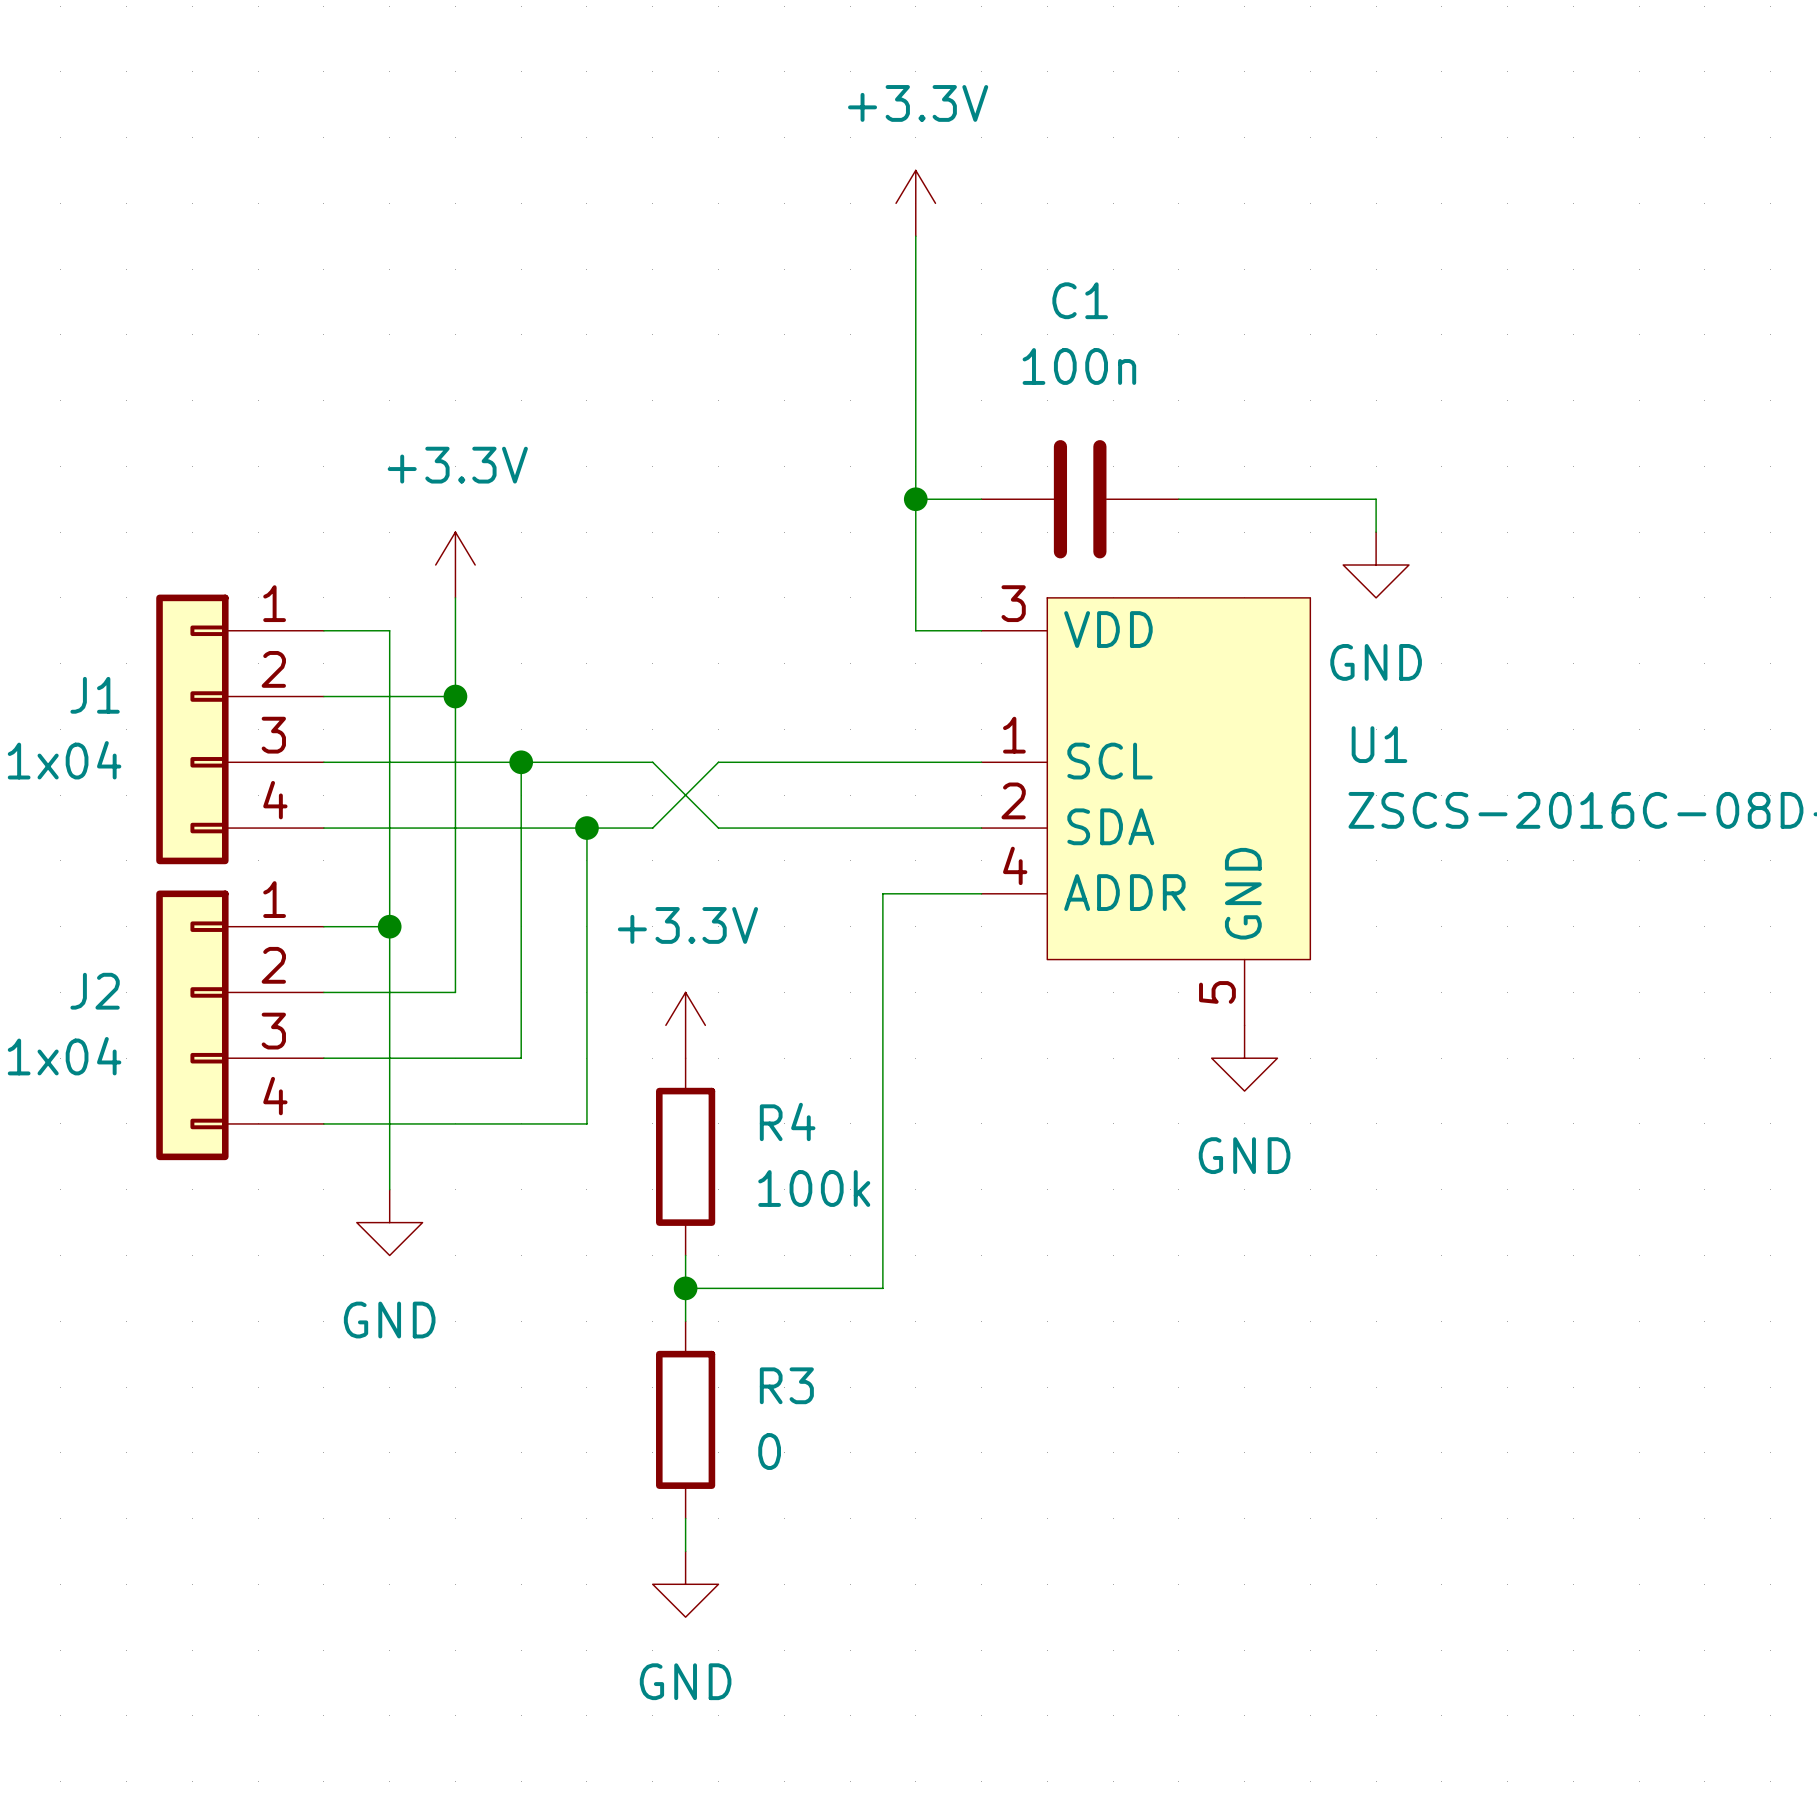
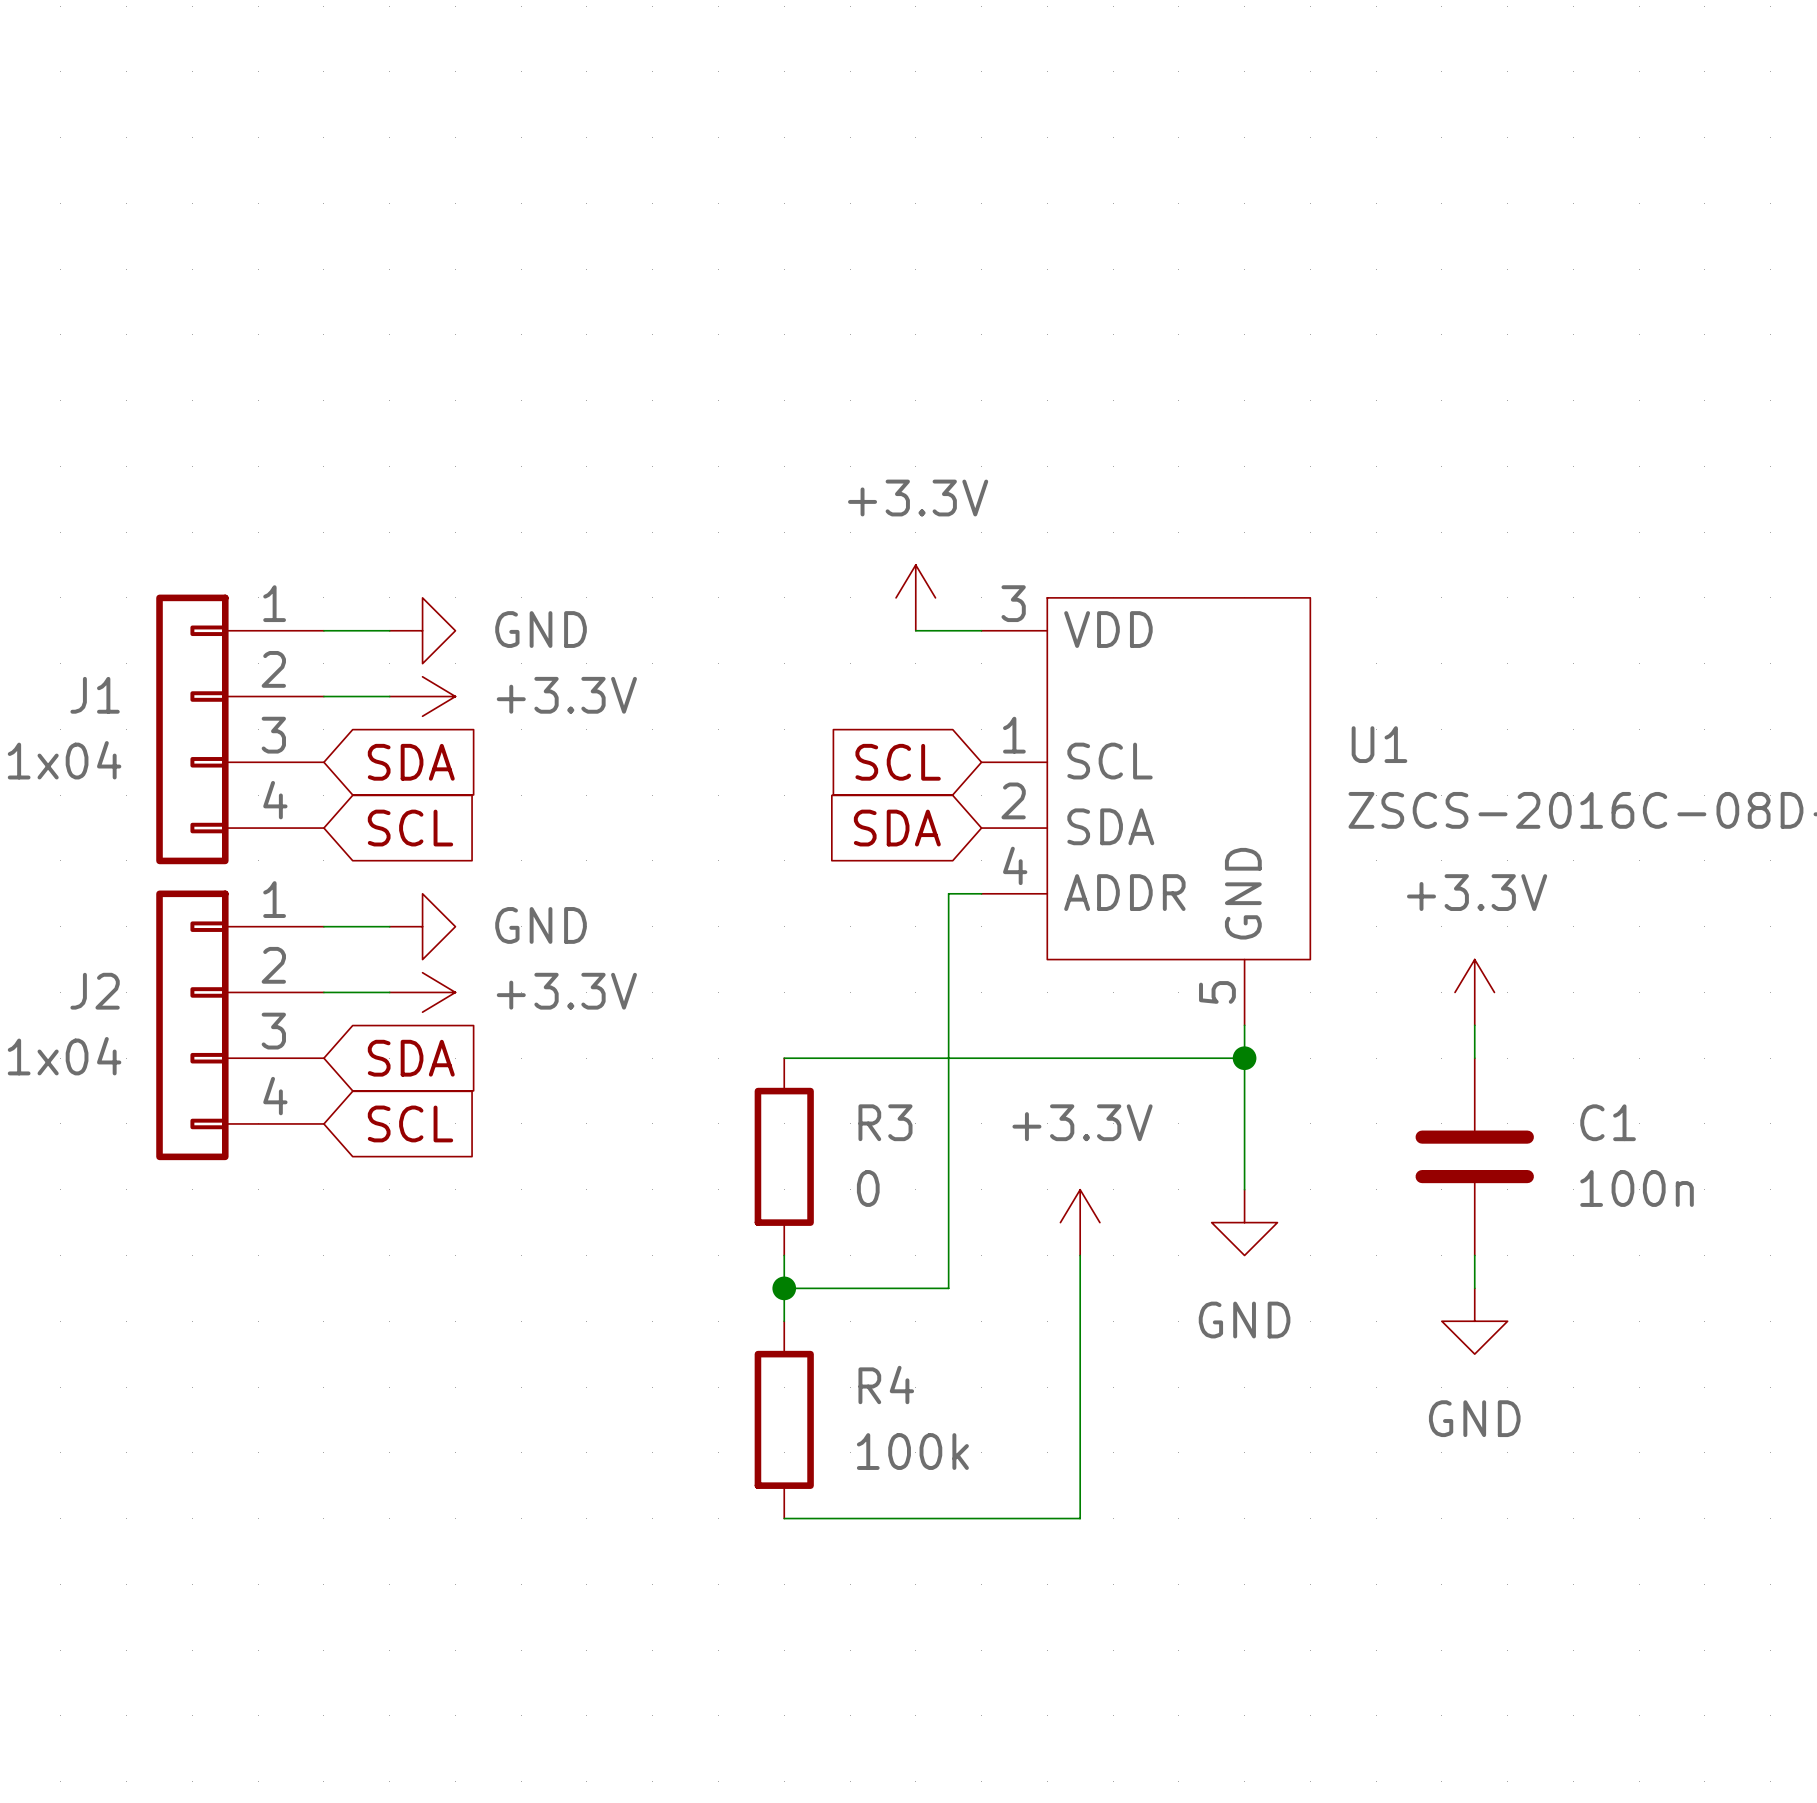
power symbol: +3.3V (915, 203) -> none
wire: (915, 236) (915, 630) -> none
C1 name position: C1 (1080, 300) -> C1 (1608, 1122)
C1 value position: 100n (1079, 366) -> 100n (1637, 1188)
power symbol text position: +3.3V (457, 465) -> +3.3V (566, 695)
wire: (915, 499) (981, 499) -> none
junction: (915, 499) -> none
C1 rotation: 0° (1080, 499) -> 90° clockwise (1474, 1156)
C1 position: (1080, 499) -> (1474, 1156)
wire: (1178, 499) (1376, 499) (1376, 532) -> none
power symbol rotation: 0° (455, 565) -> 90° clockwise (422, 696)
power symbol position: +3.3V (455, 565) -> +3.3V (422, 696)
power symbol: GND (1376, 565) -> none
wire: (455, 597) (455, 992) (389, 992) -> none
power symbol: none -> +3.3V (915, 597)
wire: (389, 630) (389, 1189) -> none
power symbol: none -> GND (422, 630)
junction: (455, 696) -> none
wire: (323, 762) (652, 762) (718, 828) (981, 828) -> none
global label: none -> SDA (411, 762)
wire: (521, 762) (521, 1058) (323, 1058) -> none
junction: (521, 762) -> none
global label: none -> SCL (898, 762)
wire: (981, 762) (718, 762) (652, 828) (323, 828) -> none
global label: none -> SCL (410, 828)
wire: (586, 828) (586, 1123) (323, 1123) -> none
junction: (586, 828) -> none
global label: none -> SDA (897, 828)
wire: (948, 893) (882, 893) (882, 1288) -> (948, 893) (948, 1288) (882, 1288)
junction: (389, 926) -> none
power symbol: none -> GND (422, 926)
power symbol: none -> +3.3V (422, 992)
power symbol: none -> +3.3V (1474, 992)
power symbol: +3.3V (685, 1025) -> none
wire: none -> (1244, 1025) (1244, 1189)
wire: none -> (1474, 1025) (1474, 1058)
global label: none -> SDA (411, 1058)
wire: none -> (784, 1058) (1244, 1058)
junction: none -> (1244, 1058)
power symbol position: GND (1244, 1058) -> GND (1244, 1222)
global label: none -> SCL (410, 1123)
R4 position: (685, 1156) -> (784, 1419)
power symbol: GND (389, 1222) -> none
power symbol: none -> +3.3V (1080, 1222)
wire: (685, 1255) (685, 1321) -> (784, 1255) (784, 1321)
wire: none -> (1080, 1255) (1080, 1518) (784, 1518)
wire: none -> (1474, 1255) (1474, 1288)
wire: (685, 1288) (784, 1288) -> none
junction position: (685, 1288) -> (784, 1288)
power symbol: none -> GND (1474, 1321)
R3 position: (685, 1419) -> (784, 1156)
wire: (685, 1518) (685, 1551) -> none
power symbol: GND (685, 1584) -> none

